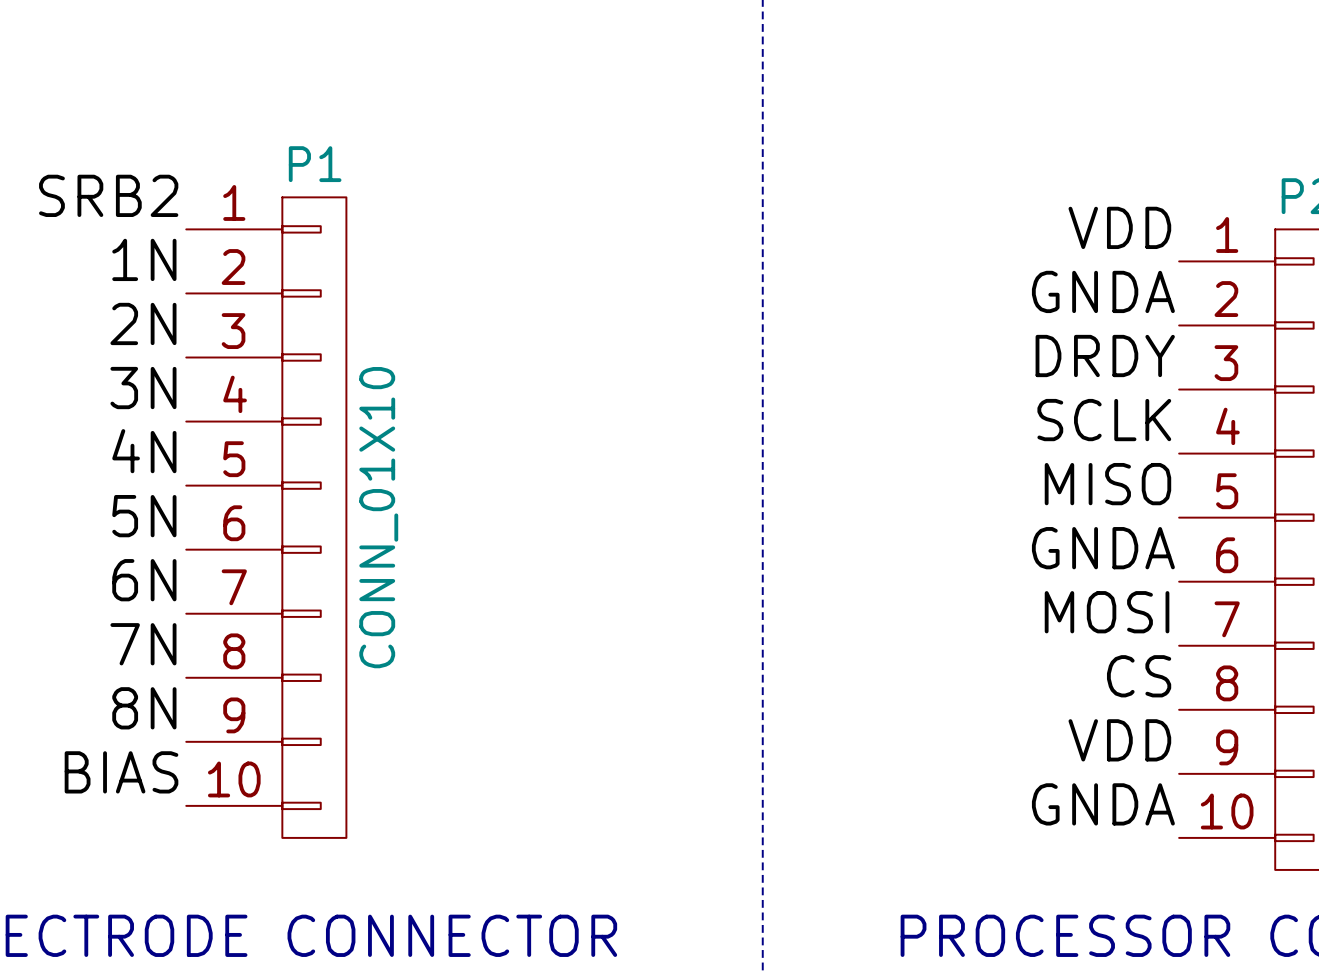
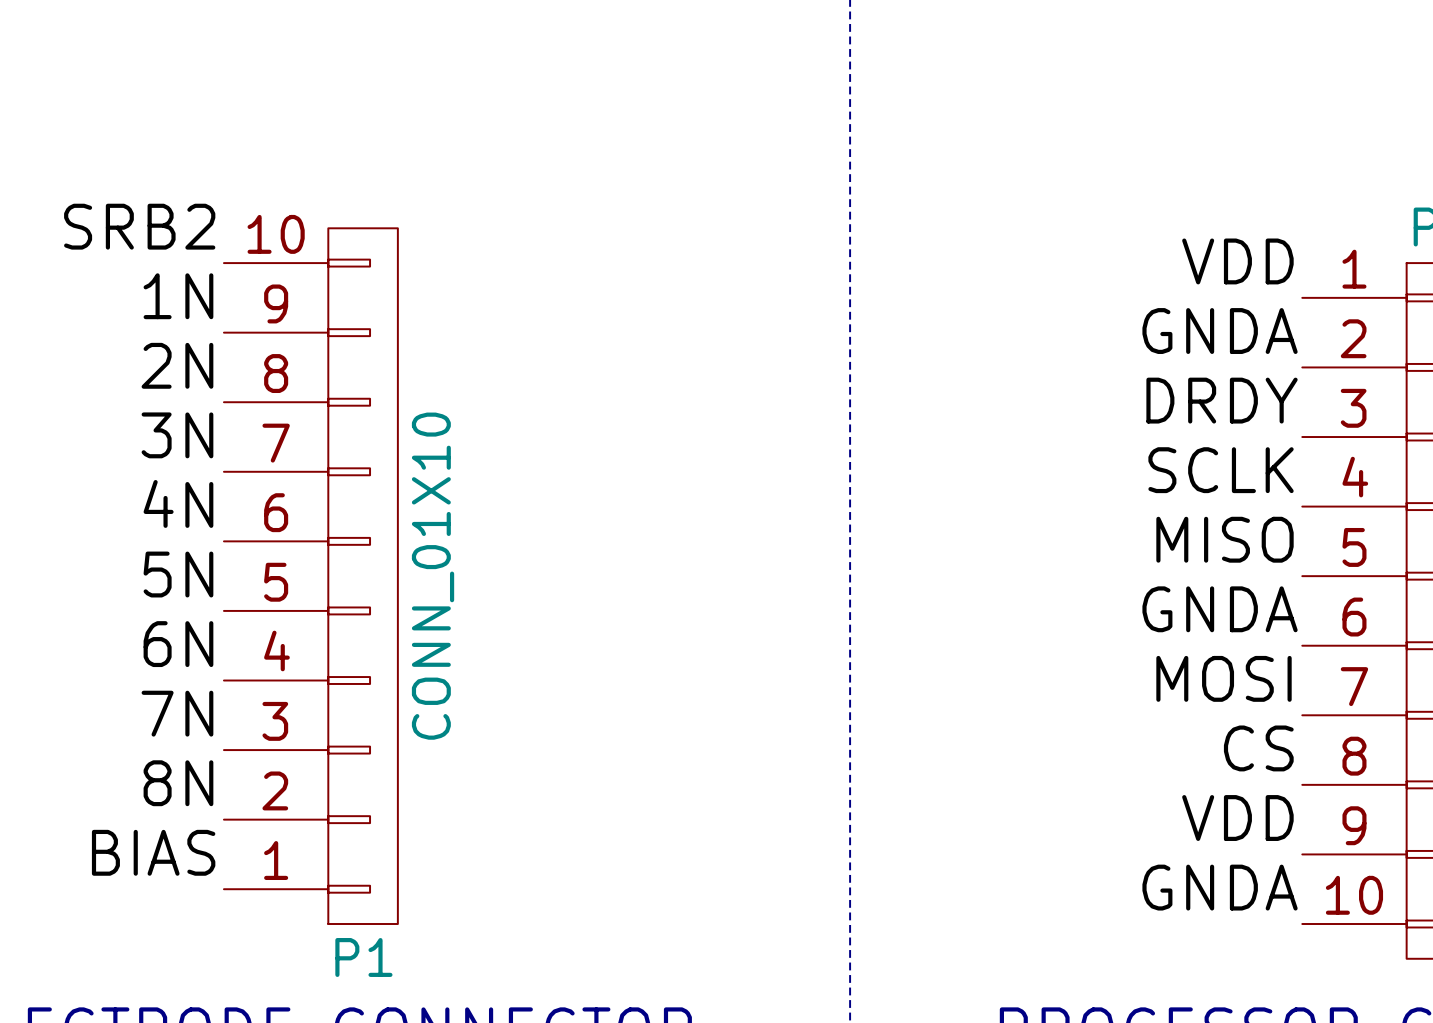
P1 flip: as is (314, 517) -> up-down (363, 576)

